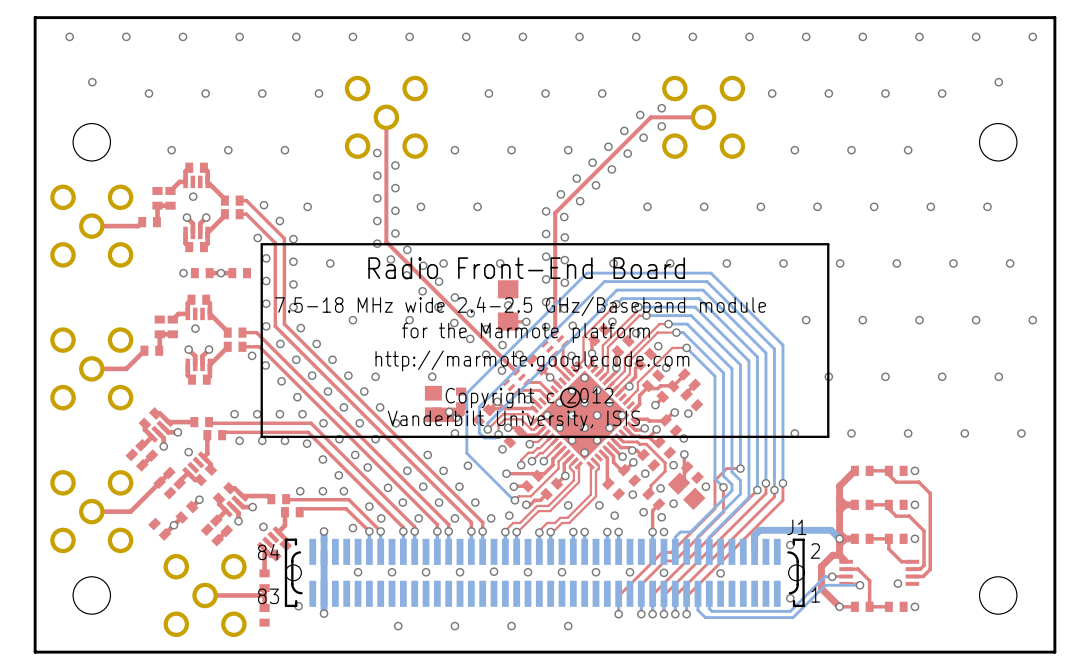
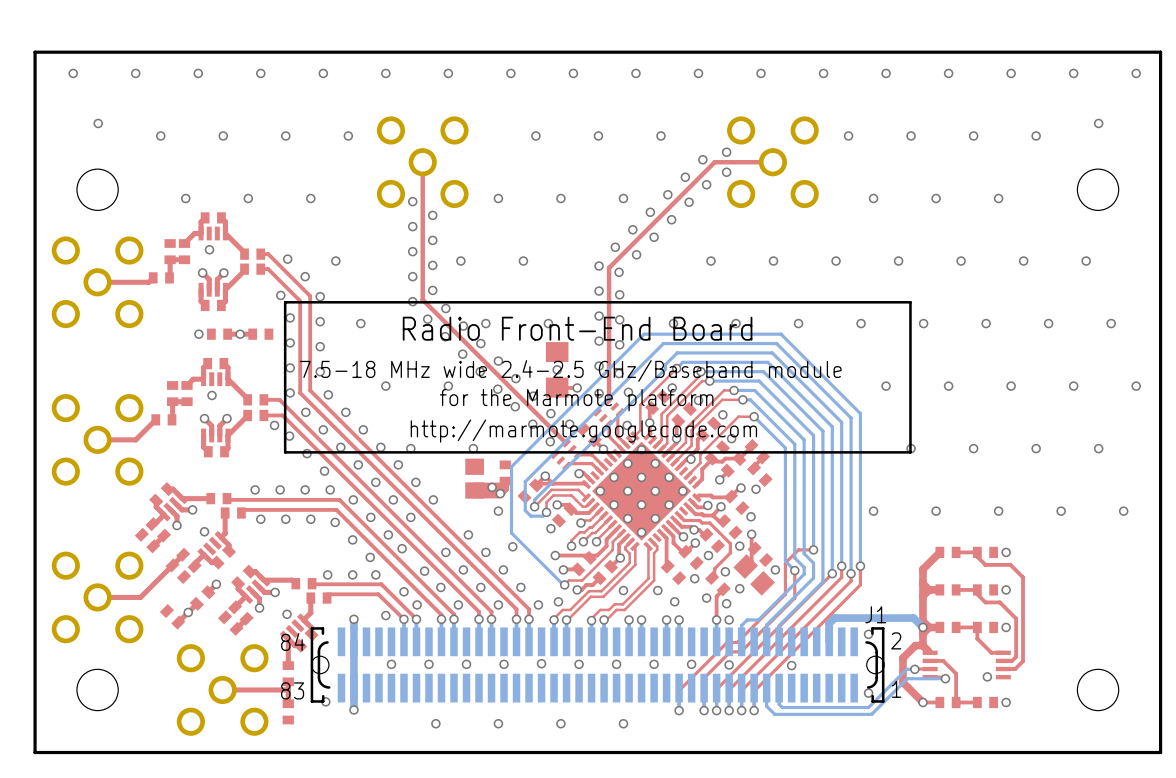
line: (828, 380) (828, 436) (261, 436) (261, 380) -> (910, 452) (285, 452)
drawing: [560, 387, 581, 409] -> none
text: Copyright c 2012 (529, 398) -> none
text: Vanderbilt University, ISIS (513, 420) -> none

